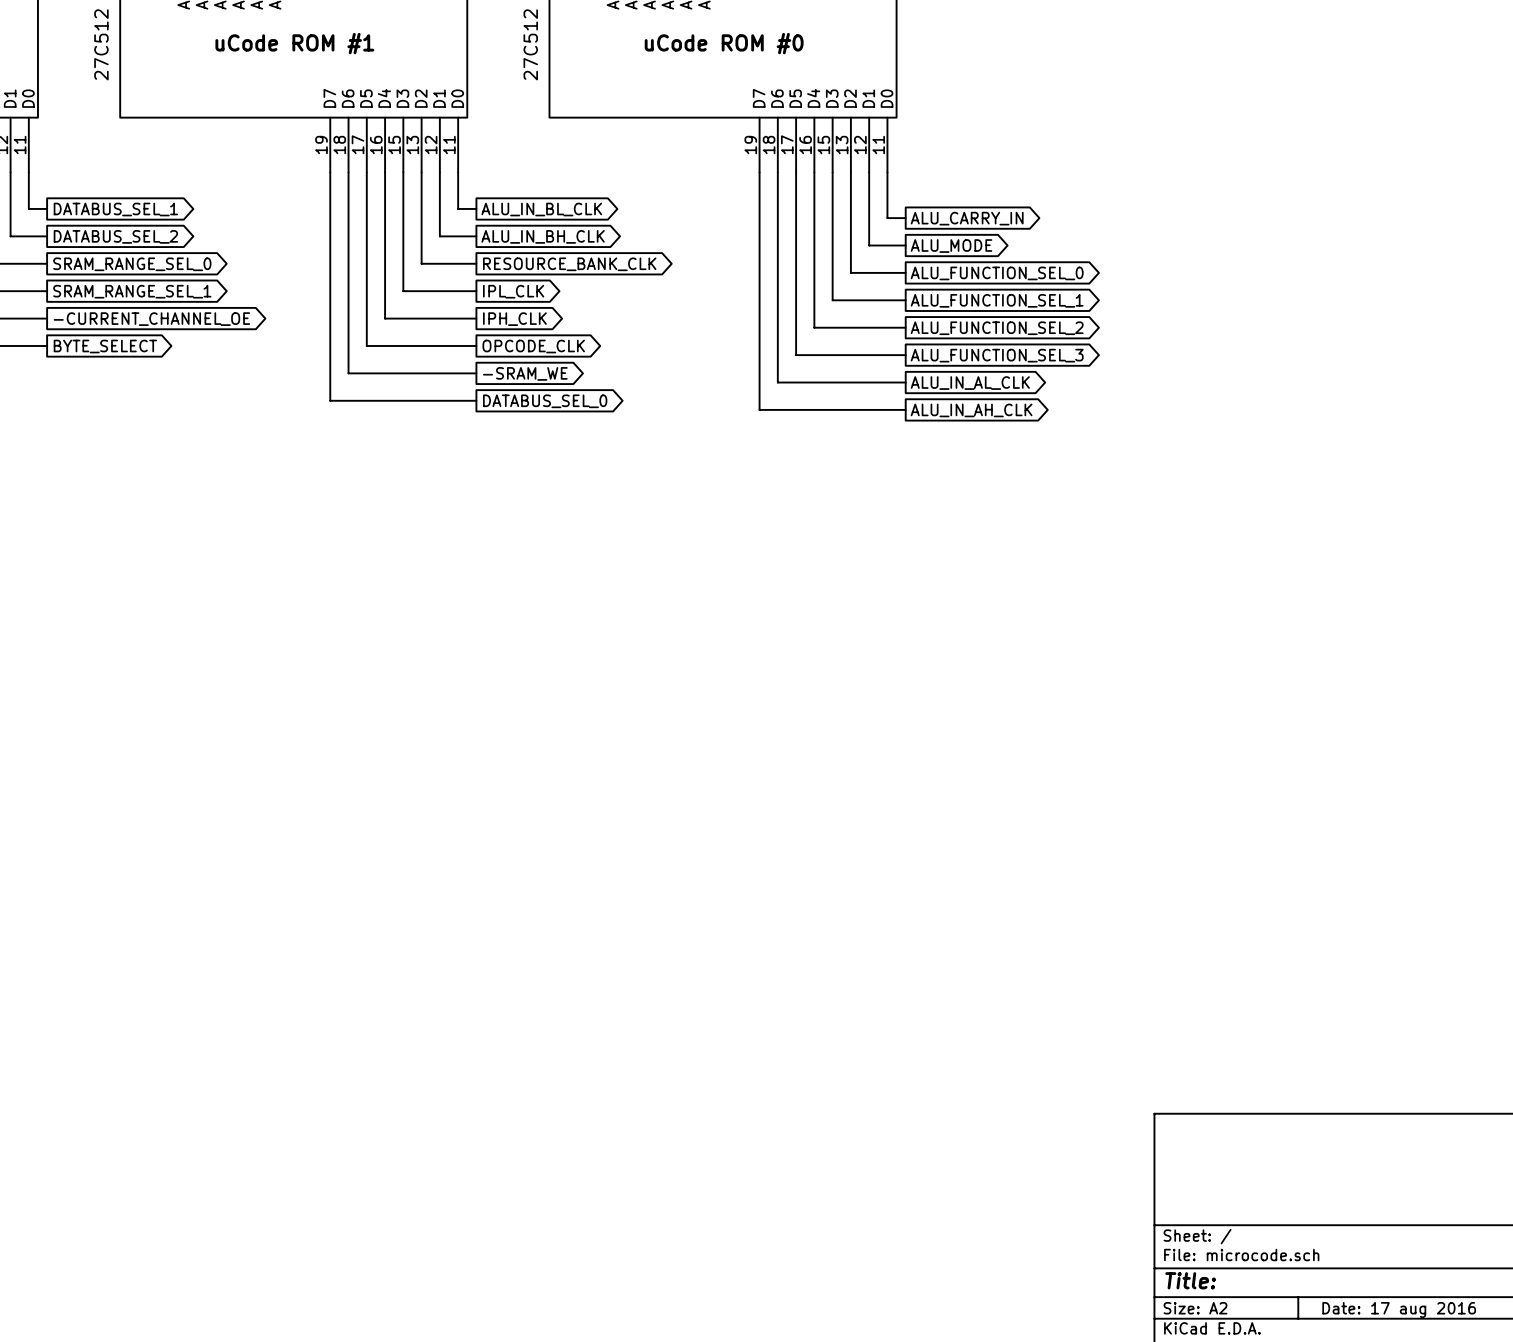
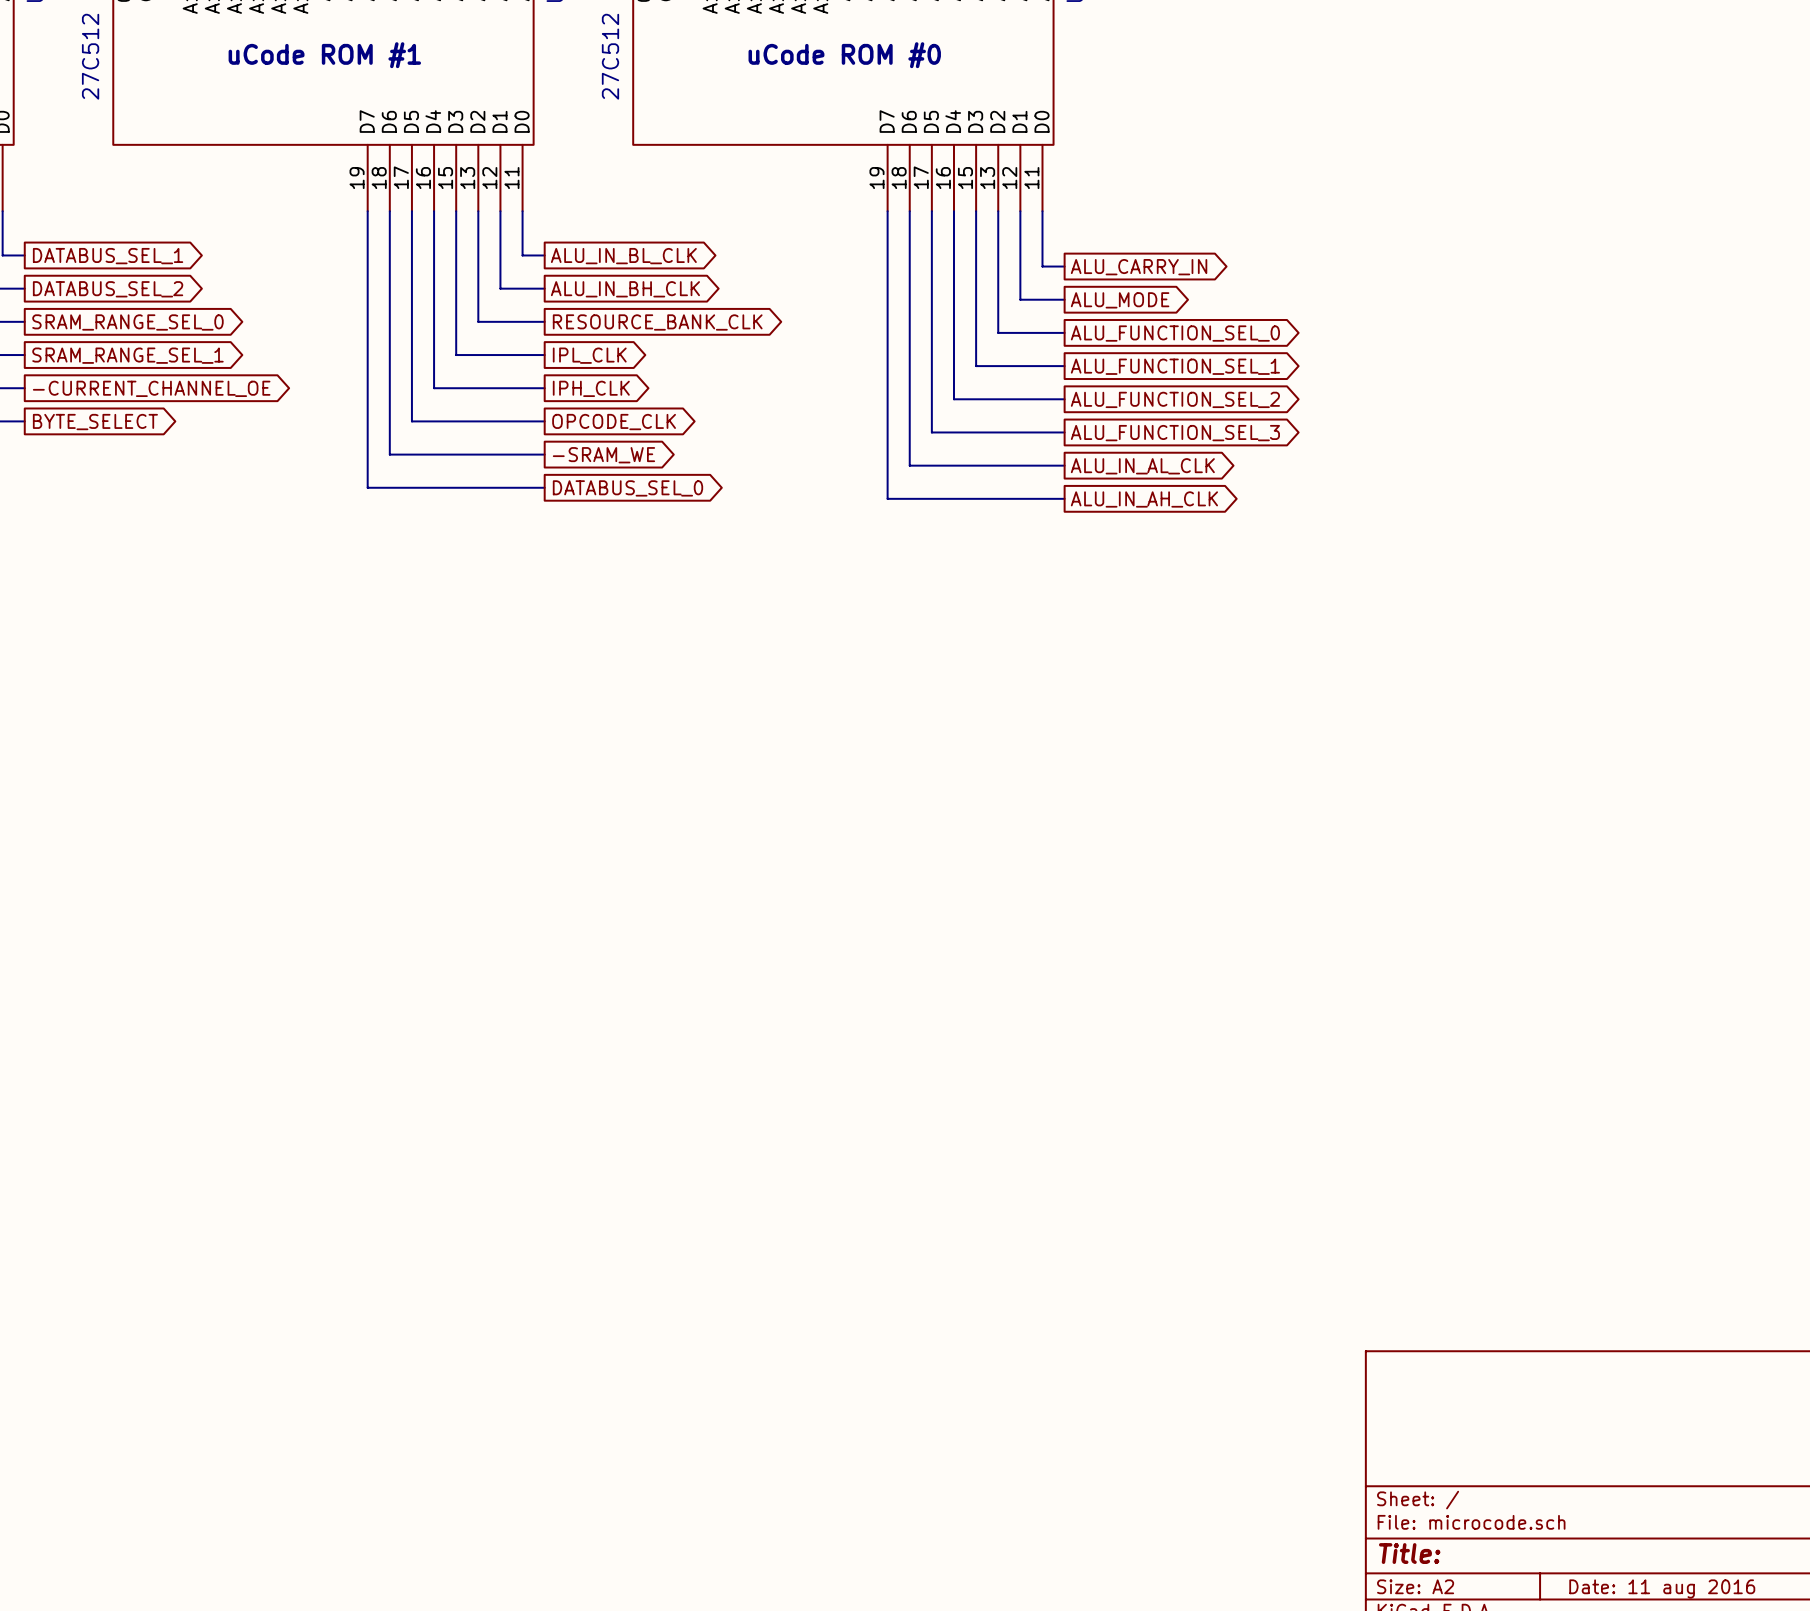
title block: Date: 17 aug 2016 (1399, 1310) -> Date: 11 aug 2016 (1662, 1588)

